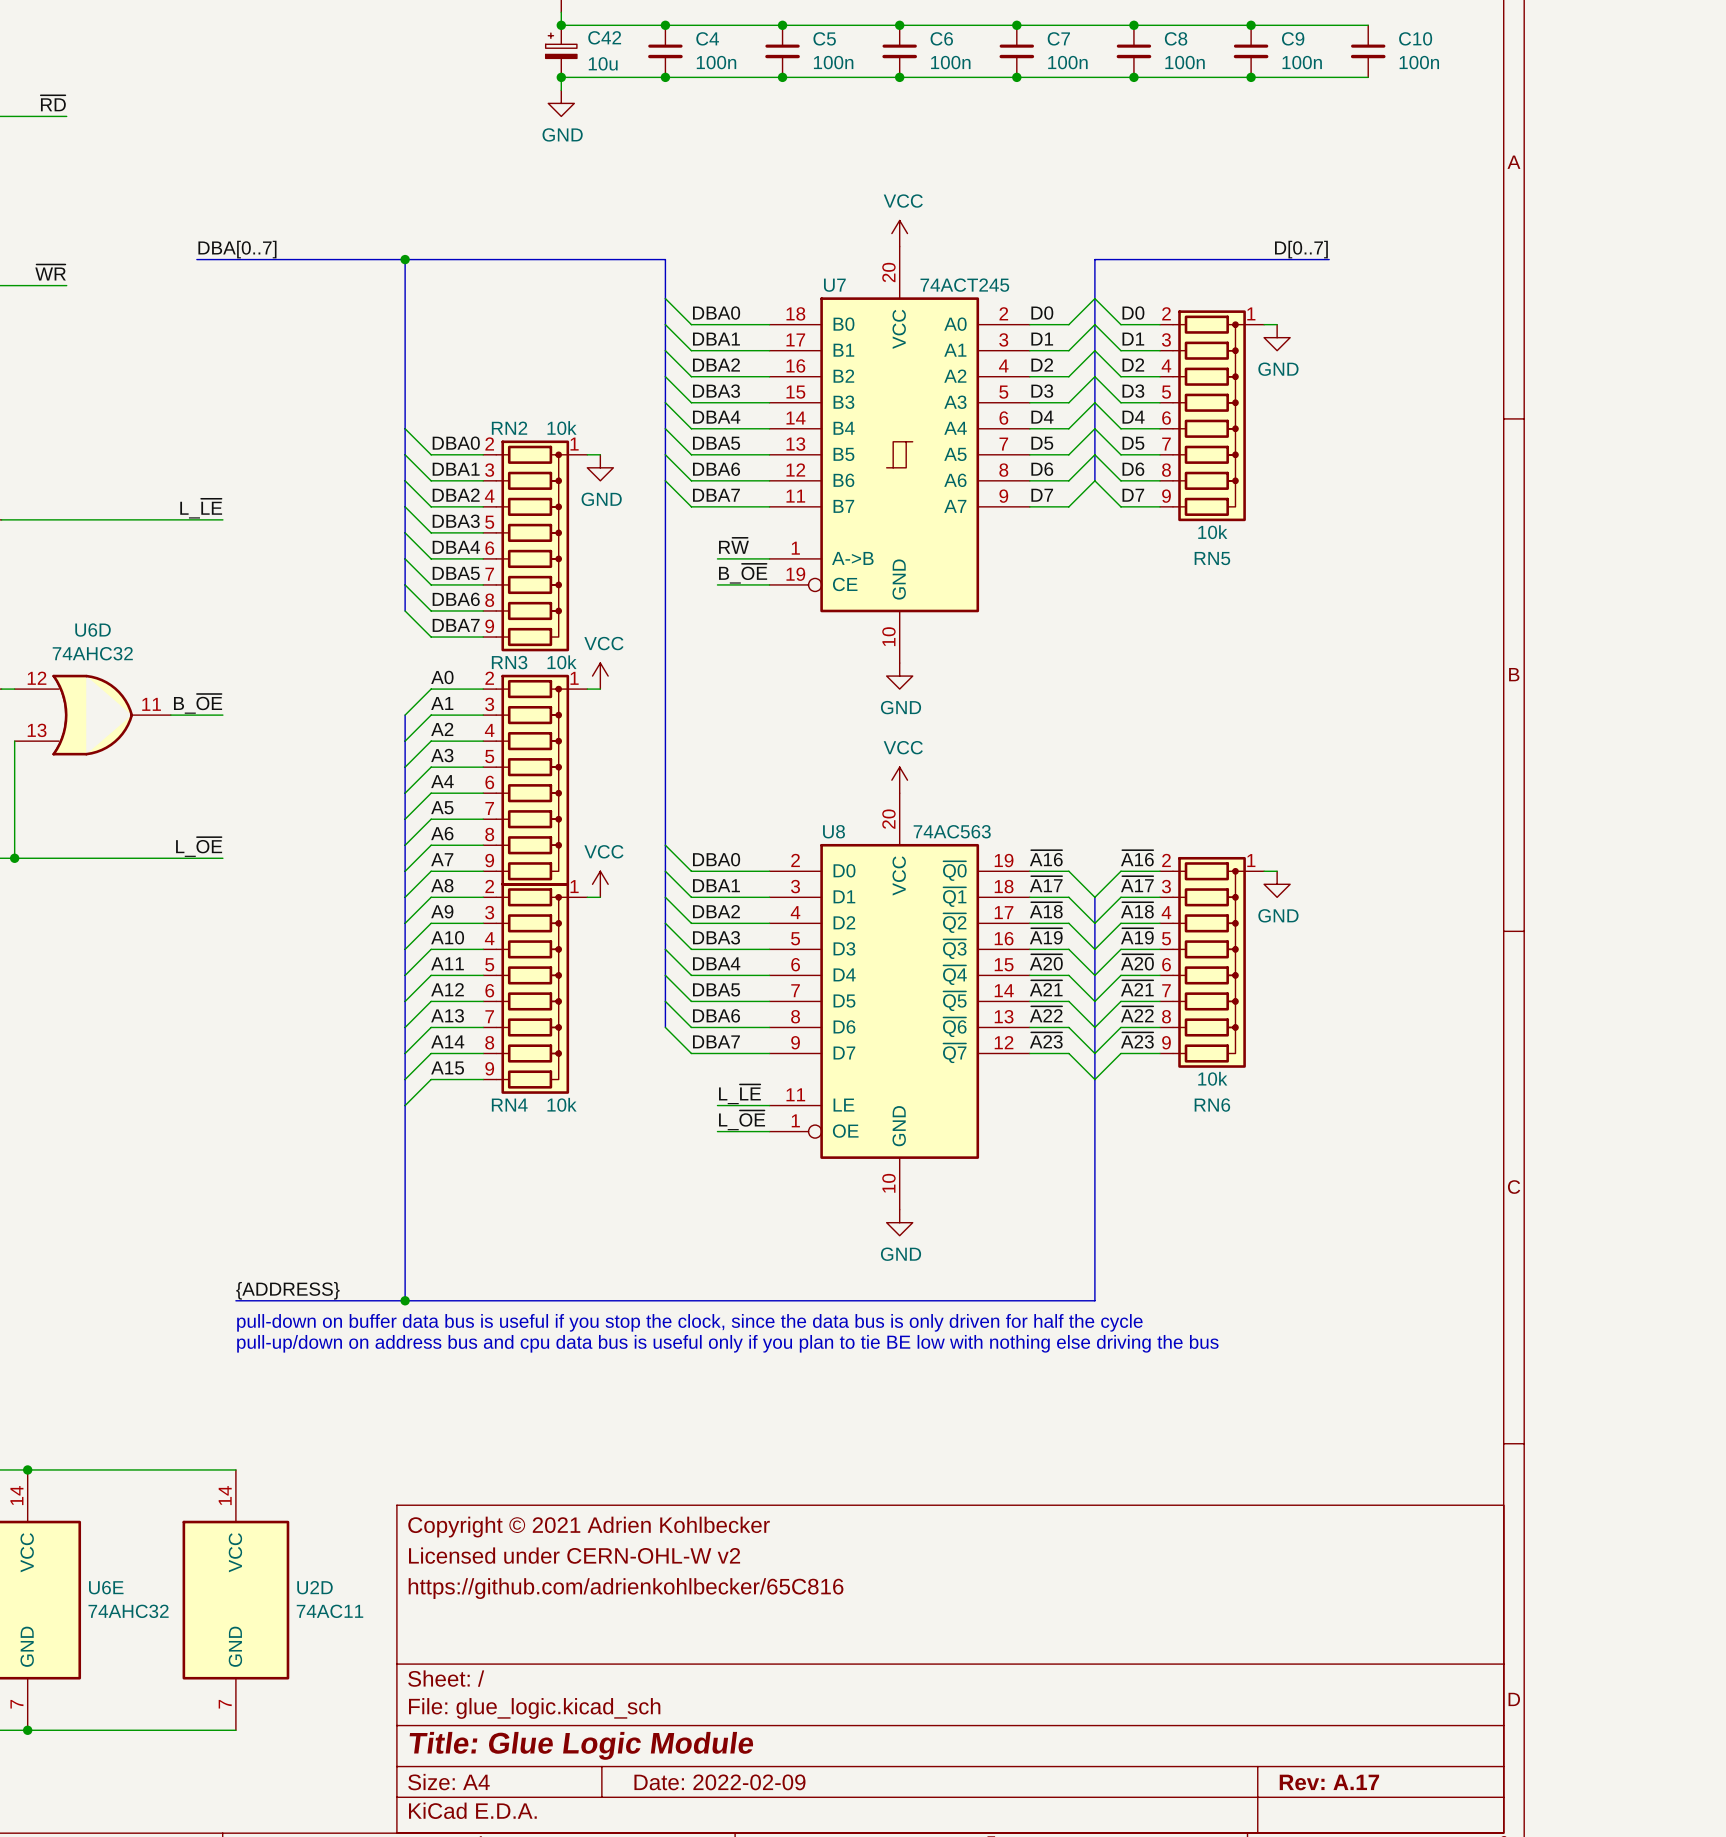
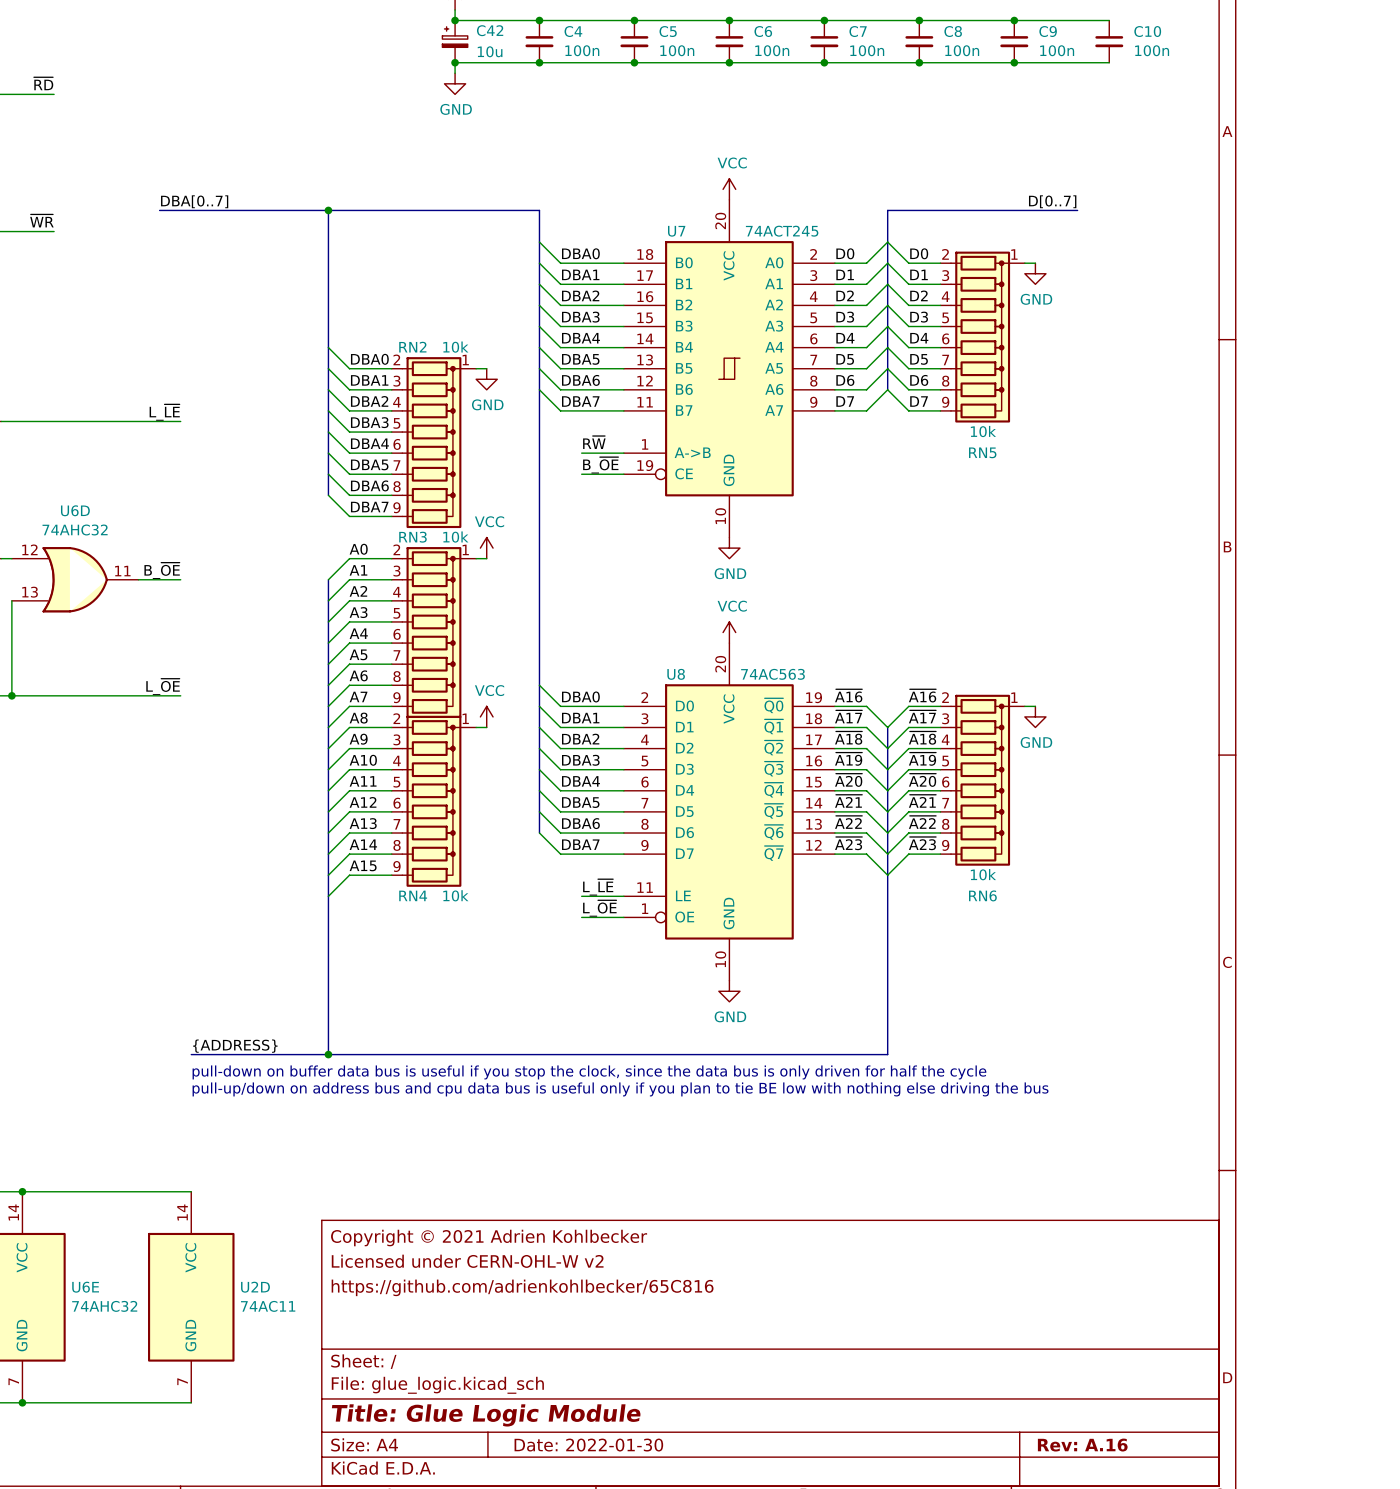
title block: Date: 2022-02-09 (719, 1782) -> Date: 2022-01-30 (588, 1445)
title block: Rev: A.17 (1329, 1782) -> Rev: A.16 (1082, 1445)

